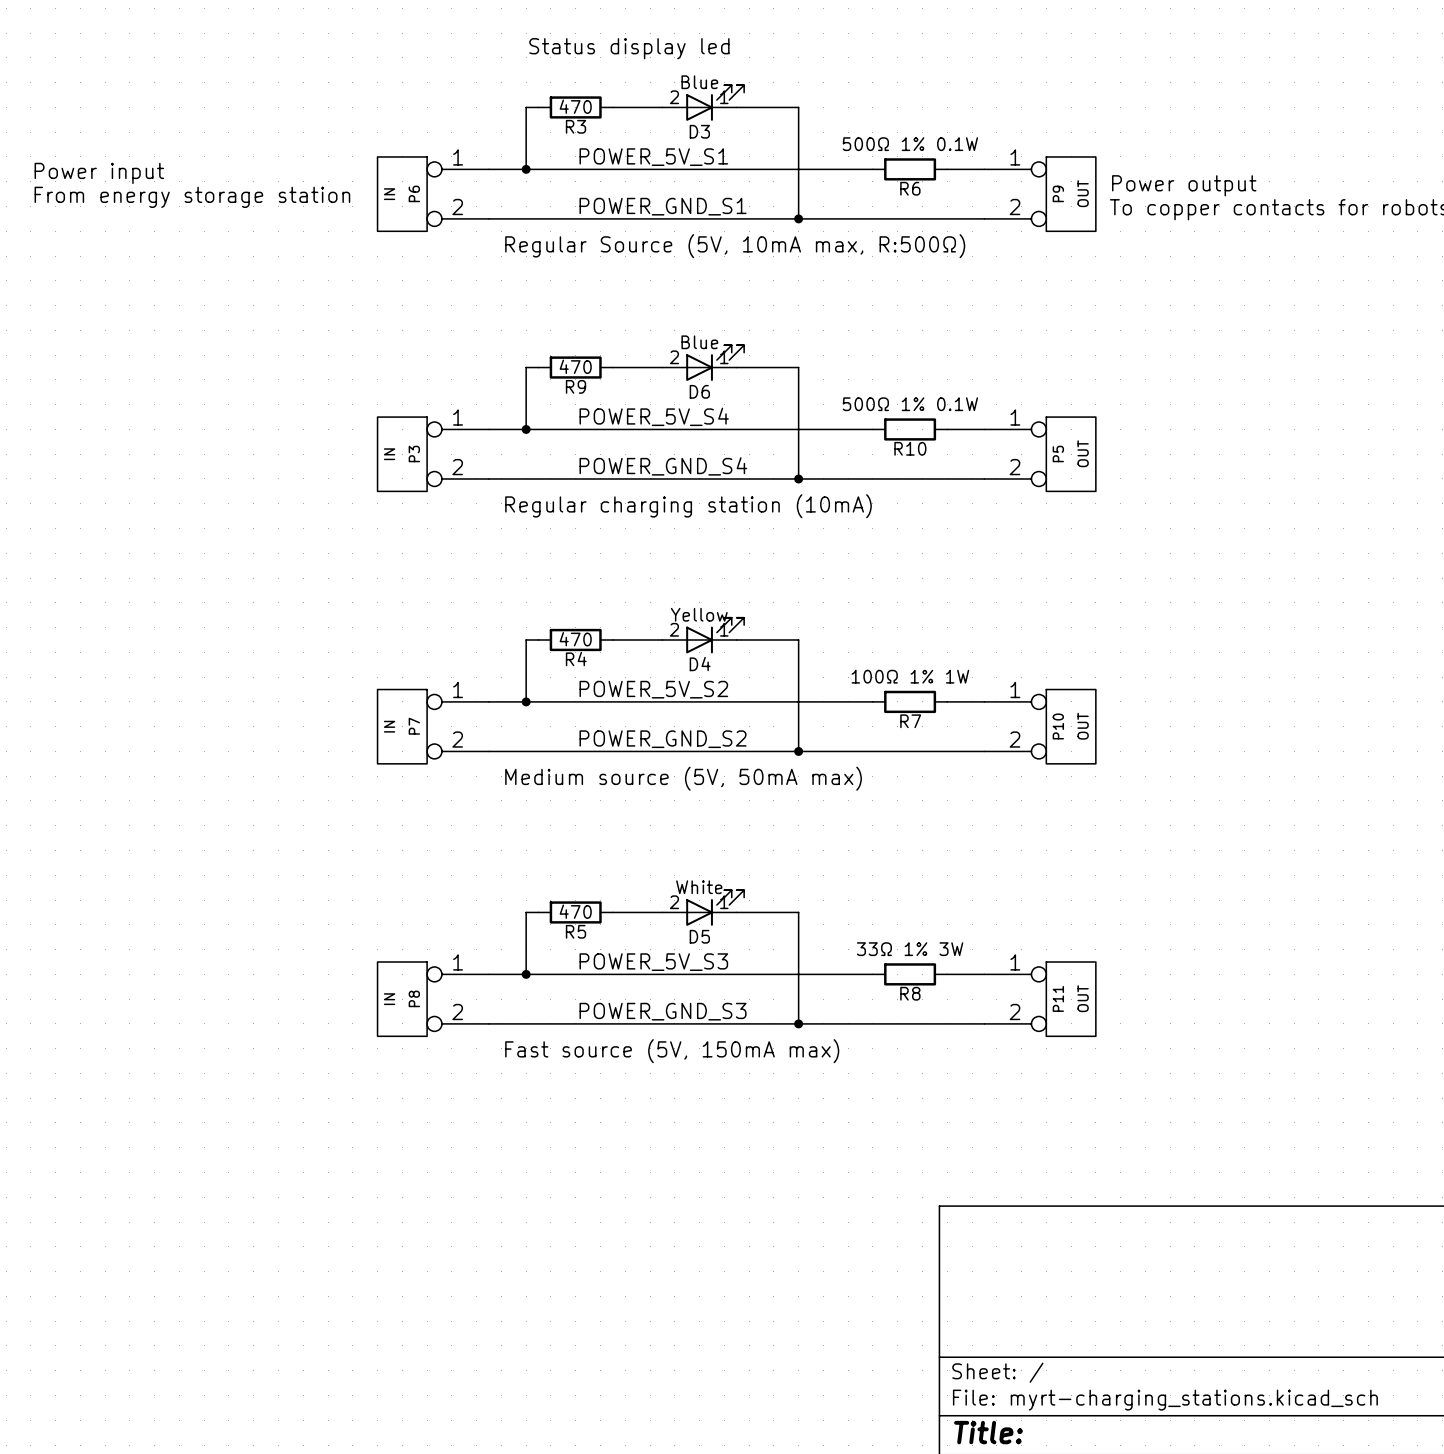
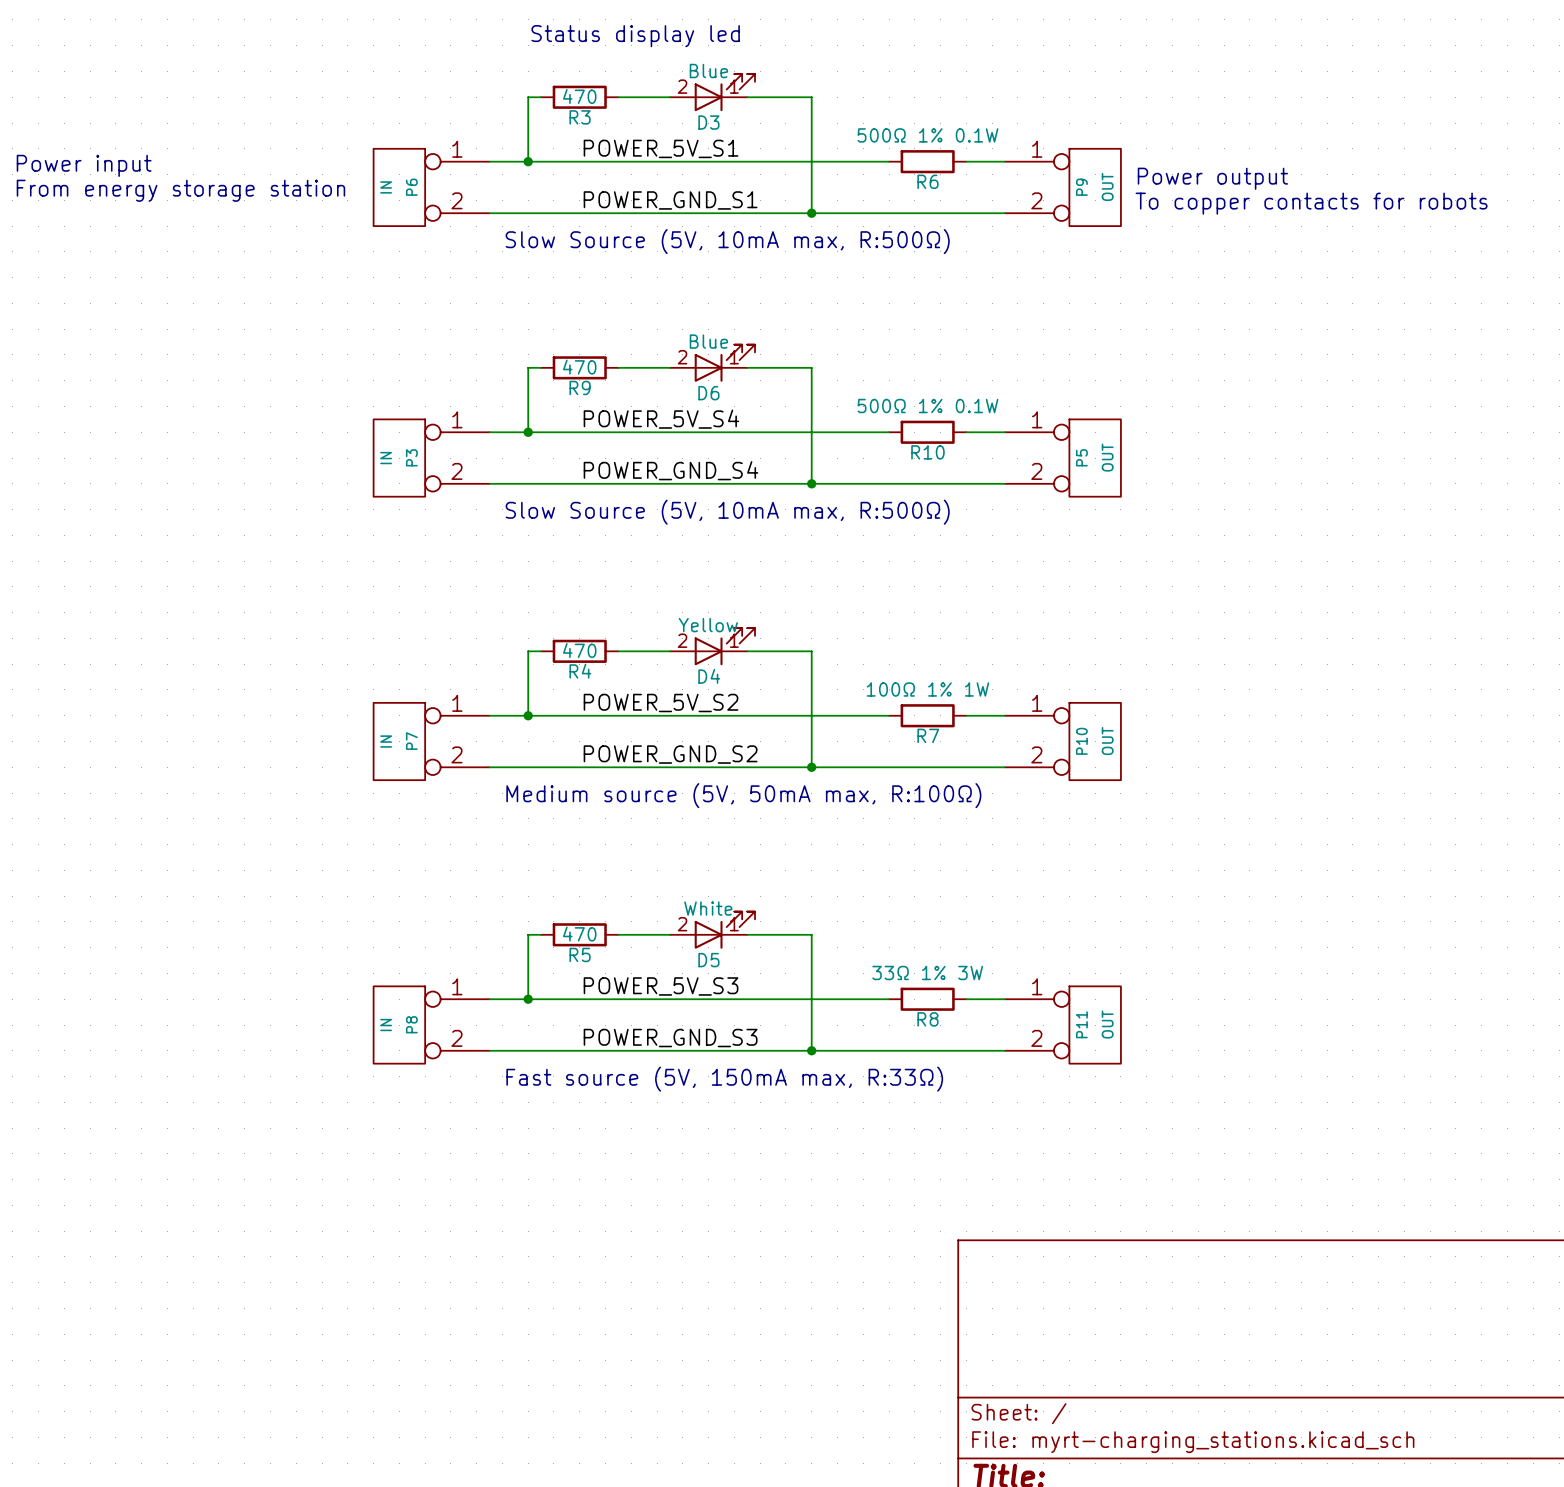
text: Regular Source (5V, 10mA max, R:500Ω) (735, 246) -> Slow Source (5V, 10mA max, R:500Ω) (727, 241)
text: Regular charging station (10mA) (688, 506) -> Slow Source (5V, 10mA max, R:500Ω) (727, 512)
text: Medium source (5V, 50mA max) (683, 778) -> Medium source (5V, 50mA max, R:100Ω) (743, 795)
text: Fast source (5V, 150mA max) (672, 1051) -> Fast source (5V, 150mA max, R:33Ω) (724, 1079)

